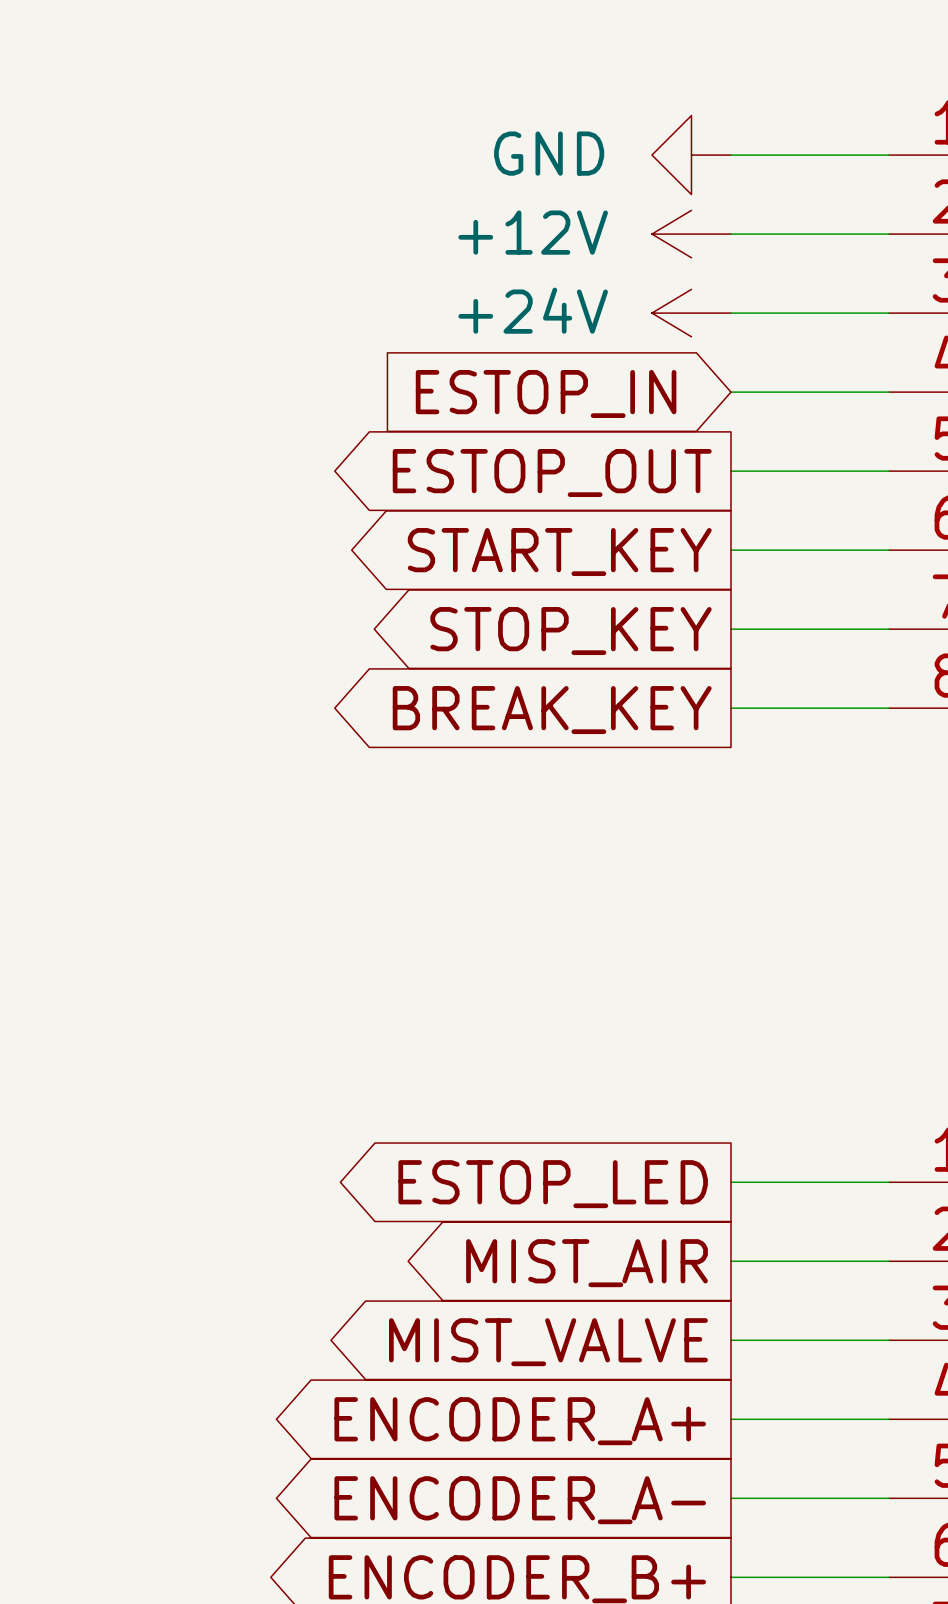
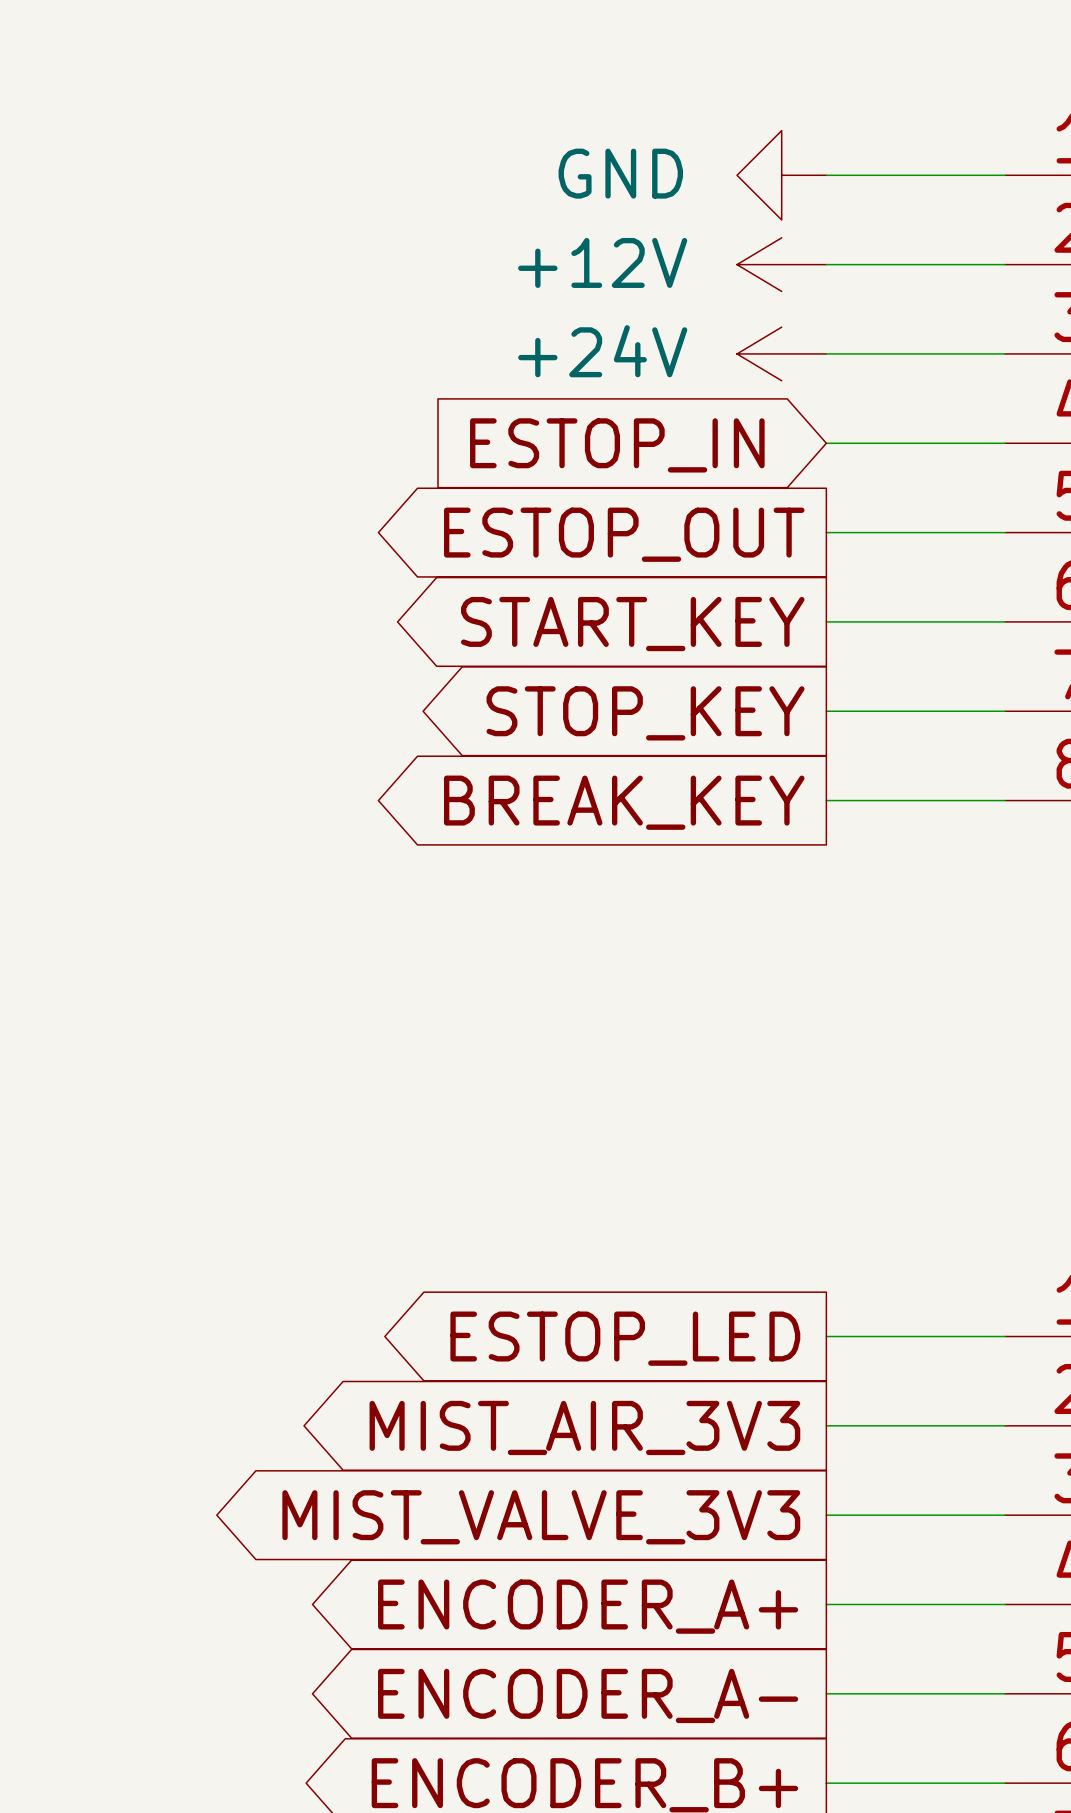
global label: MIST_AIR (587, 1263) -> MIST_AIR_3V3 (584, 1427)
global label: MIST_VALVE (548, 1342) -> MIST_VALVE_3V3 (541, 1517)

